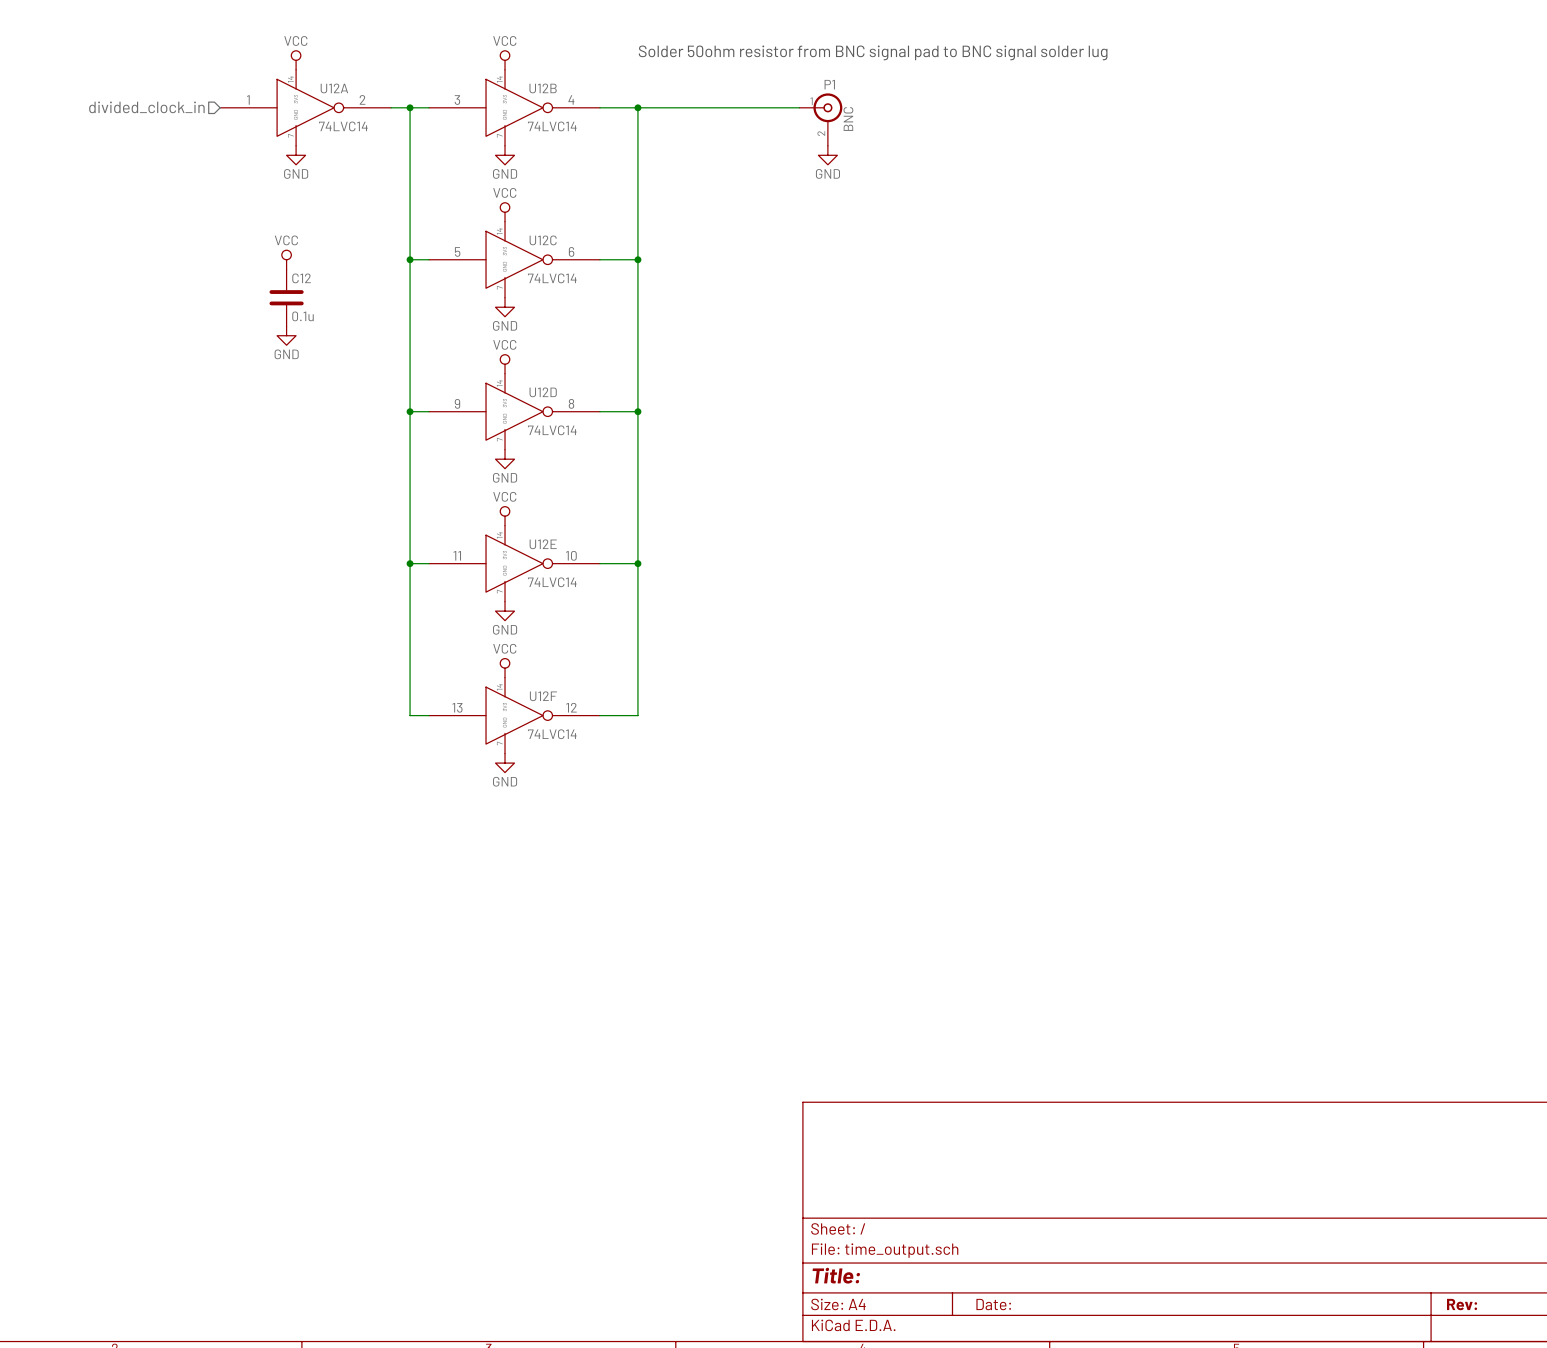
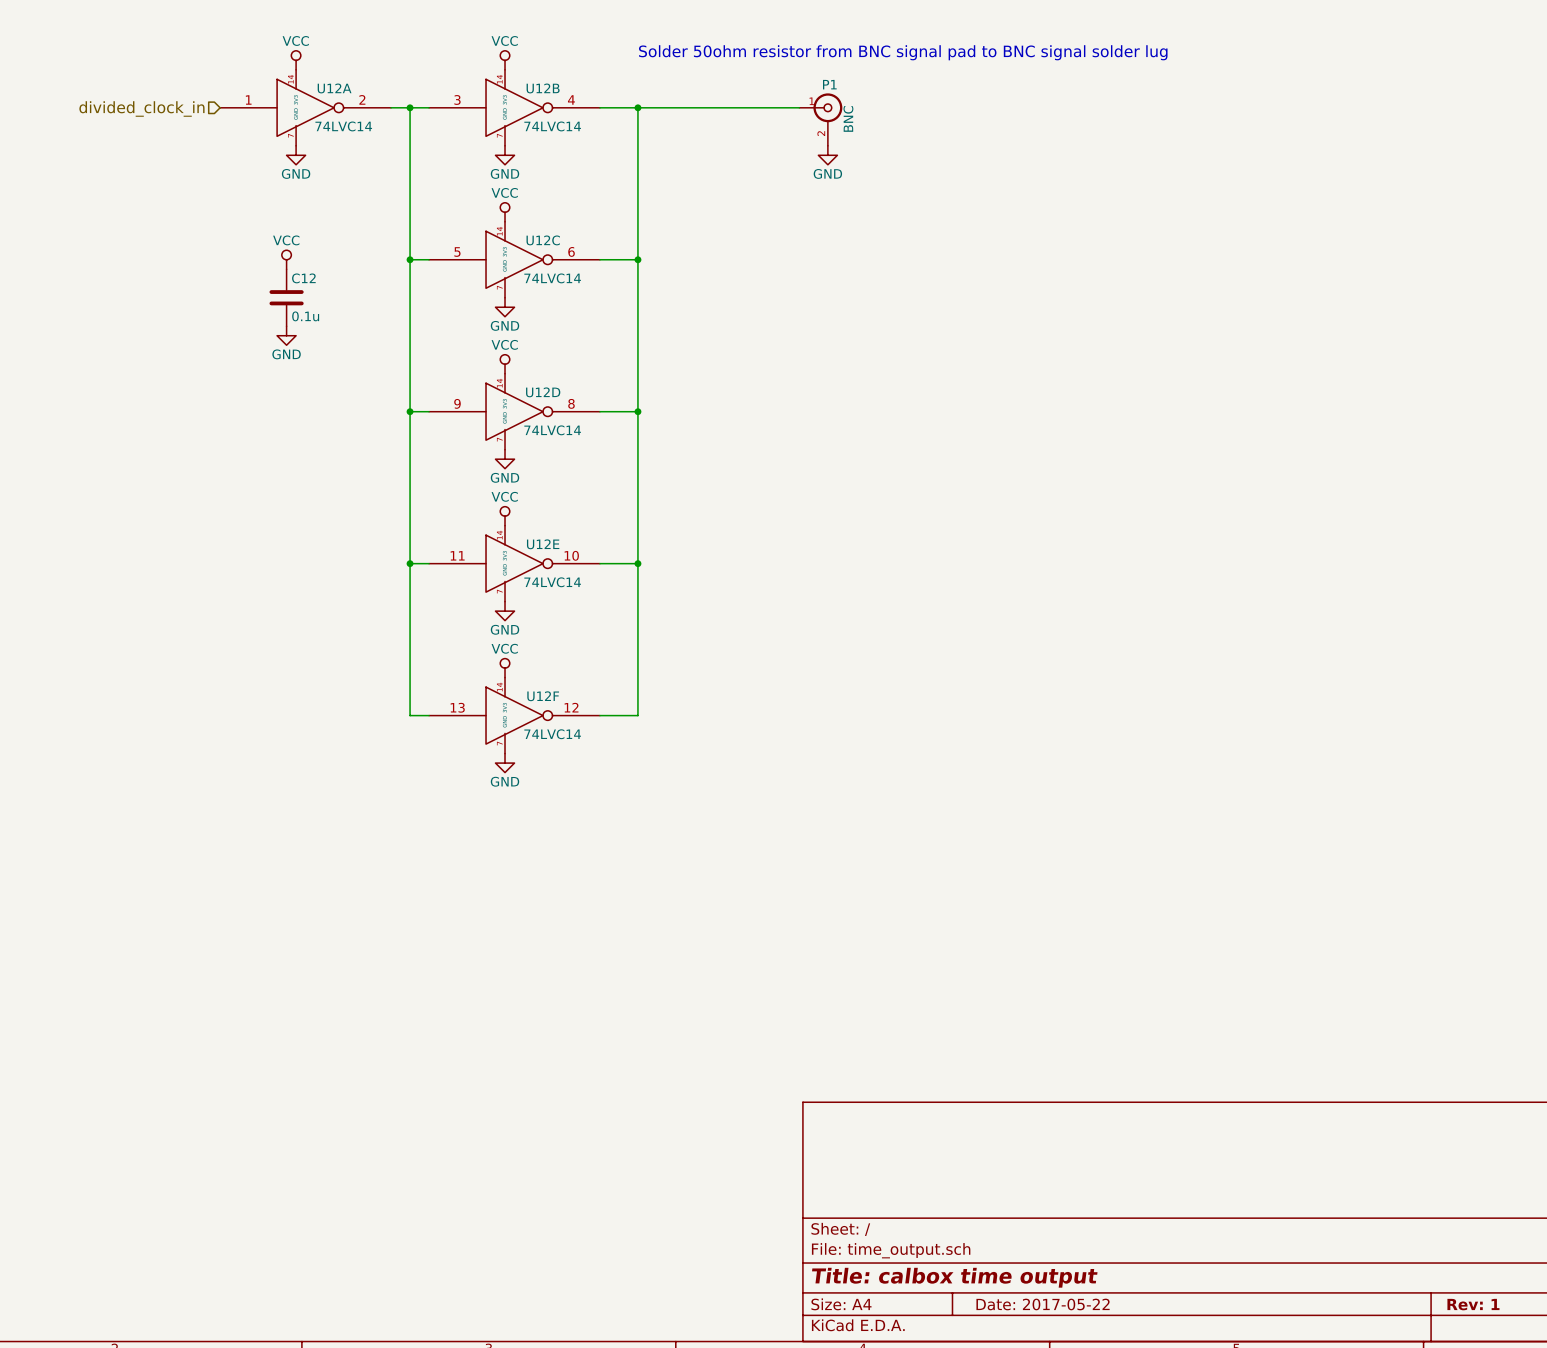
title block: Title: (836, 1275) -> Title: calbox time output (954, 1277)
title block: Date: (993, 1304) -> Date: 2017-05-22 (1043, 1304)
title block: Rev: (1462, 1304) -> Rev: 1 (1473, 1304)

